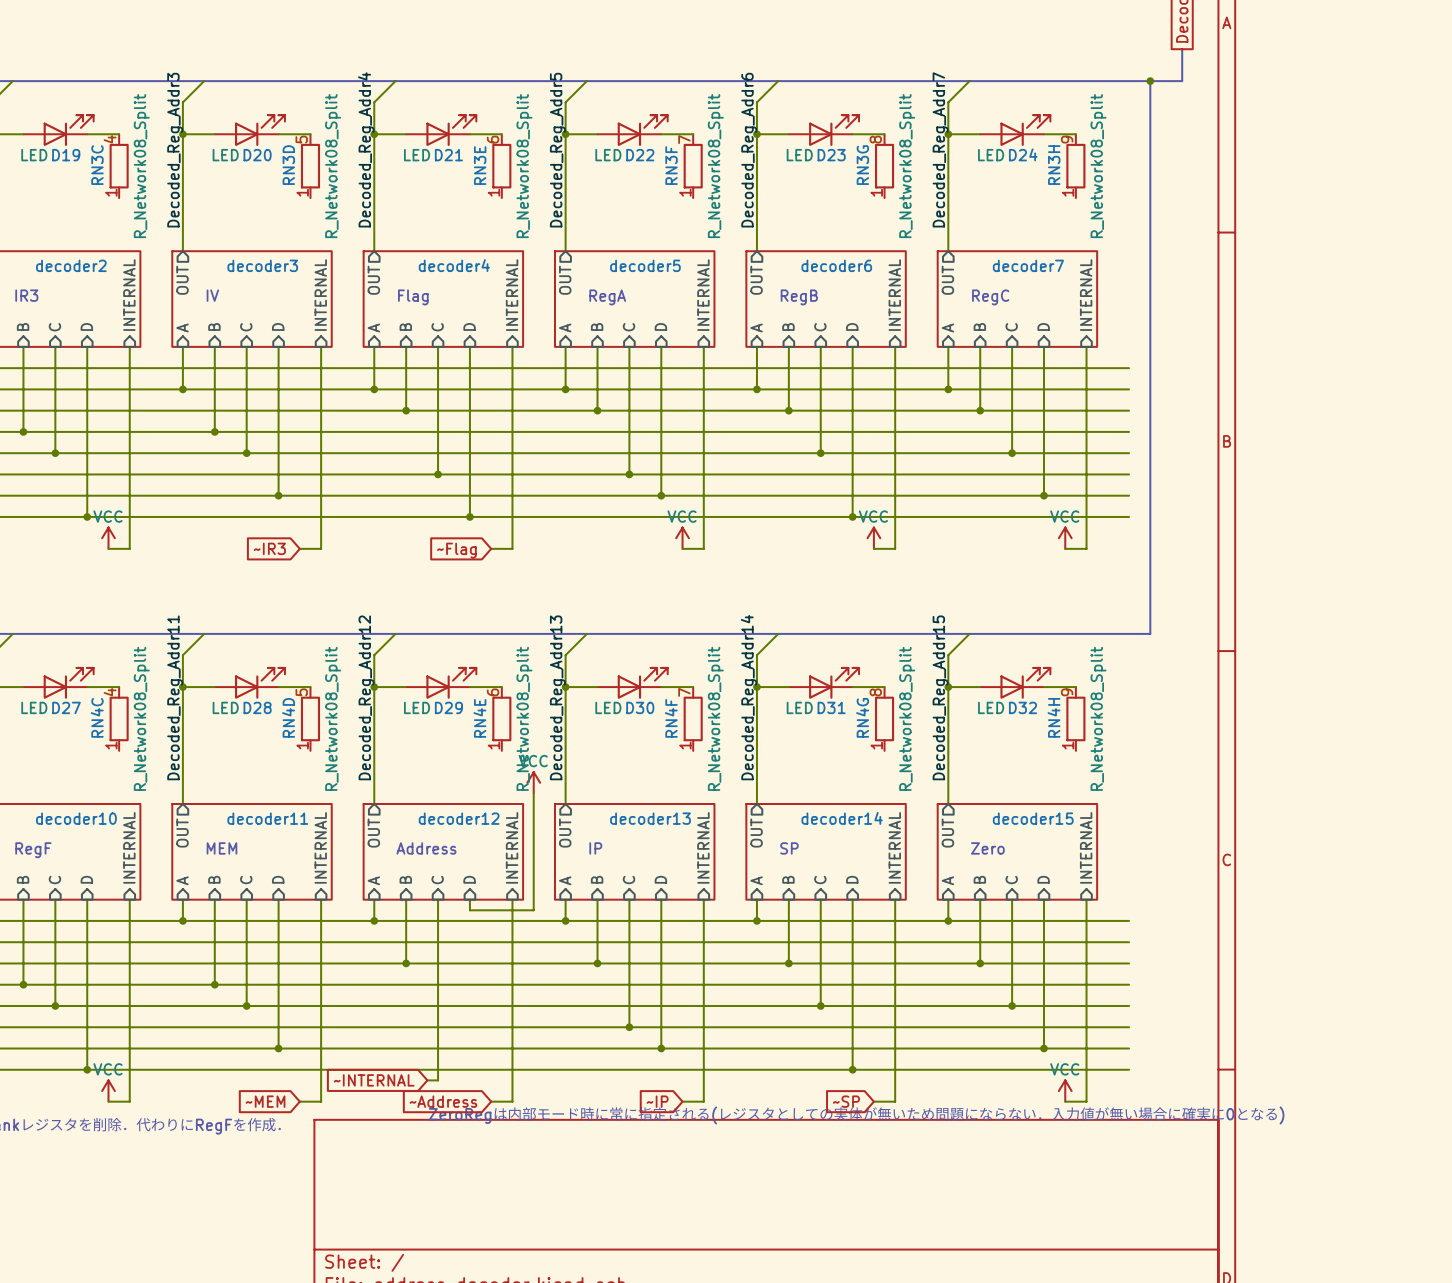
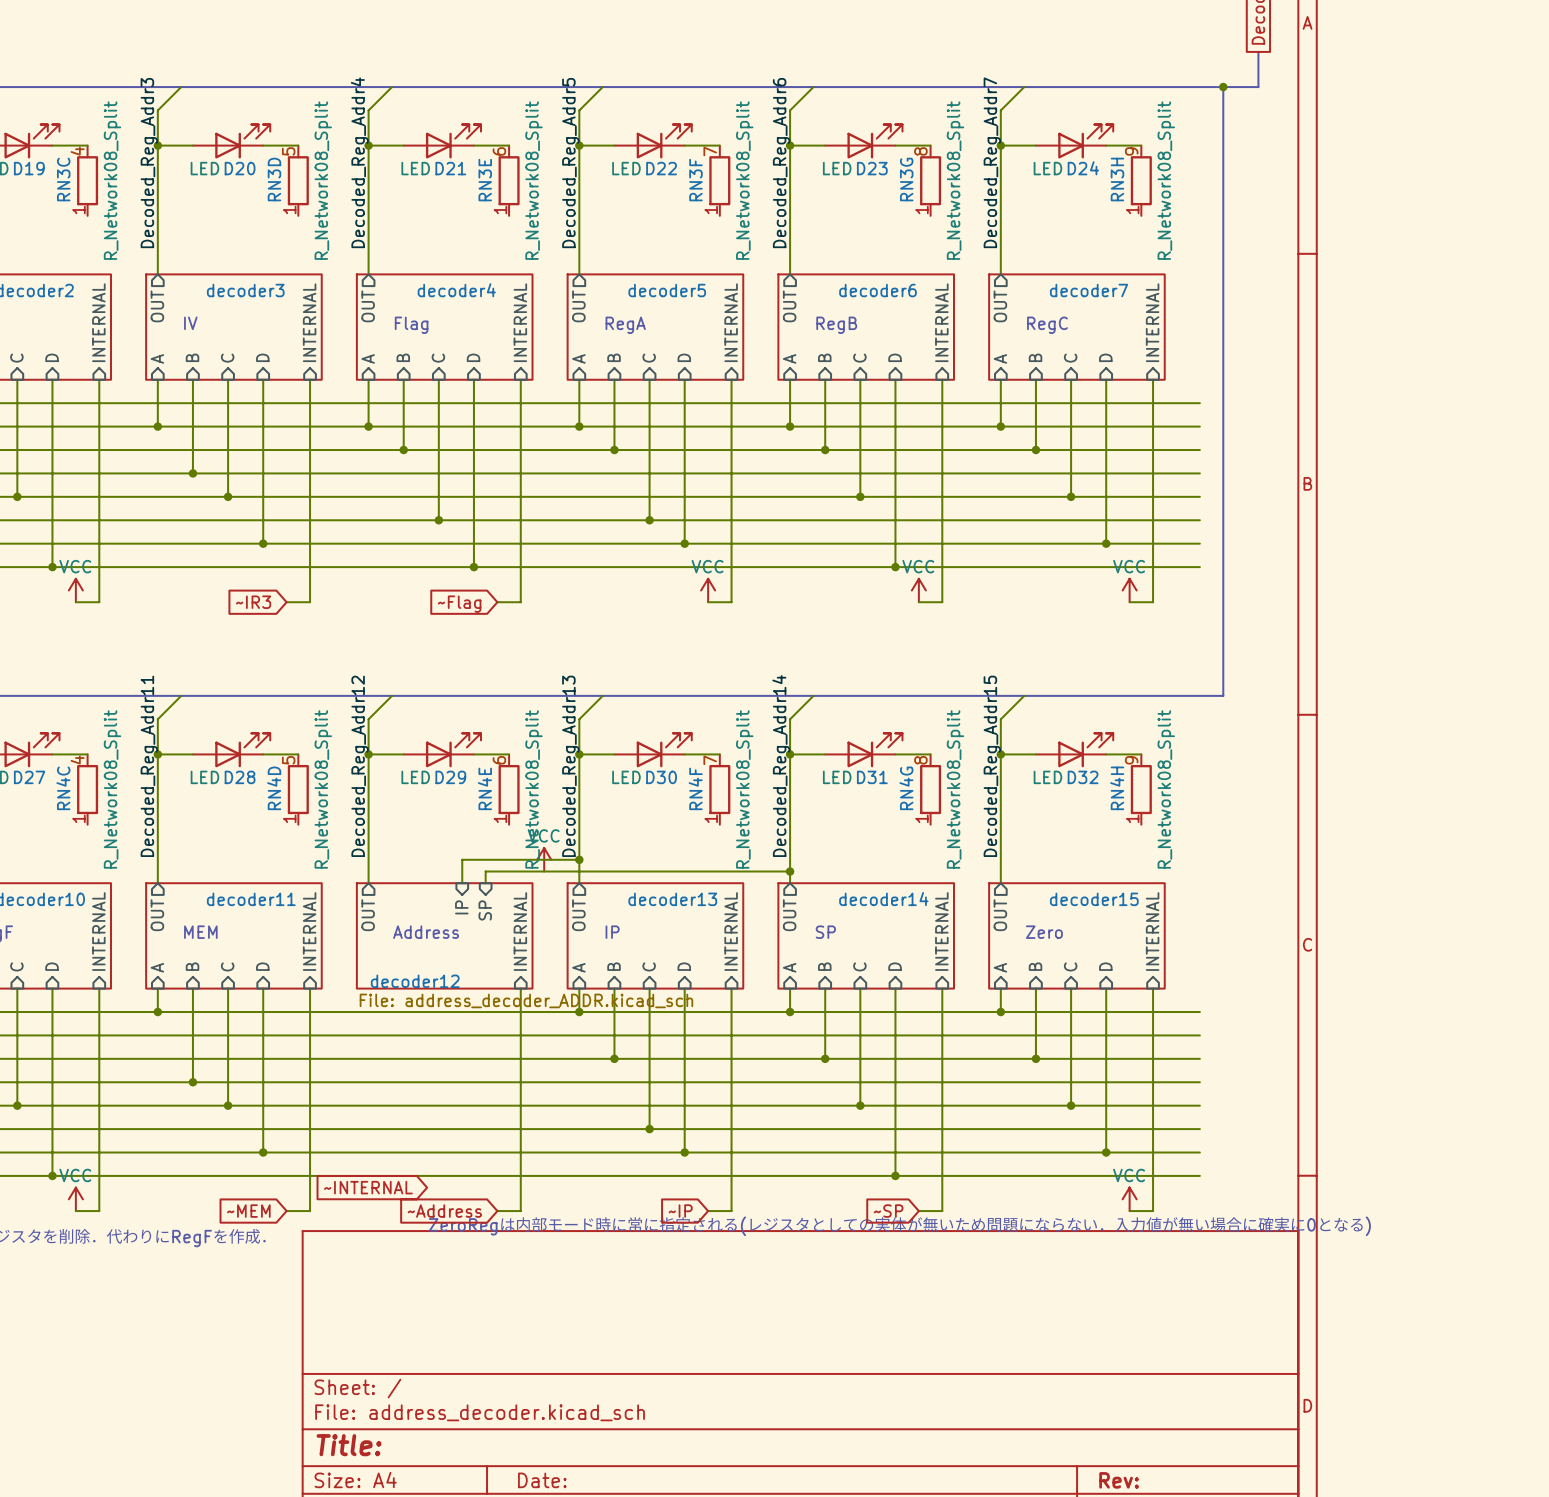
wire: none -> (579, 859) (462, 859) (462, 883)
junction: none -> (579, 859)
wire: (533, 793) (533, 910) (469, 910) (469, 899) -> none
wire: none -> (790, 871) (485, 871) (485, 883)
junction: none -> (790, 871)
sheet decoder12 name position: decoder12 (459, 818) -> decoder12 (415, 981)
sheet pin: none -> IP (461, 907)
sheet pin: none -> SP (485, 910)
sheet pin: B (405, 879) -> none
sheet pin: D (469, 879) -> none
sheet pin: A (373, 880) -> none
sheet pin: C (437, 880) -> none
wire: (374, 899) (374, 920) -> none
wire: (406, 899) (406, 963) -> none
wire: (438, 899) (438, 1080) (427, 1080) -> none
sheet decoder12 value: none -> File: address_decoder_ADDR.kicad_sch (526, 1000)
junction: (374, 920) -> none
junction: (406, 963) -> none

